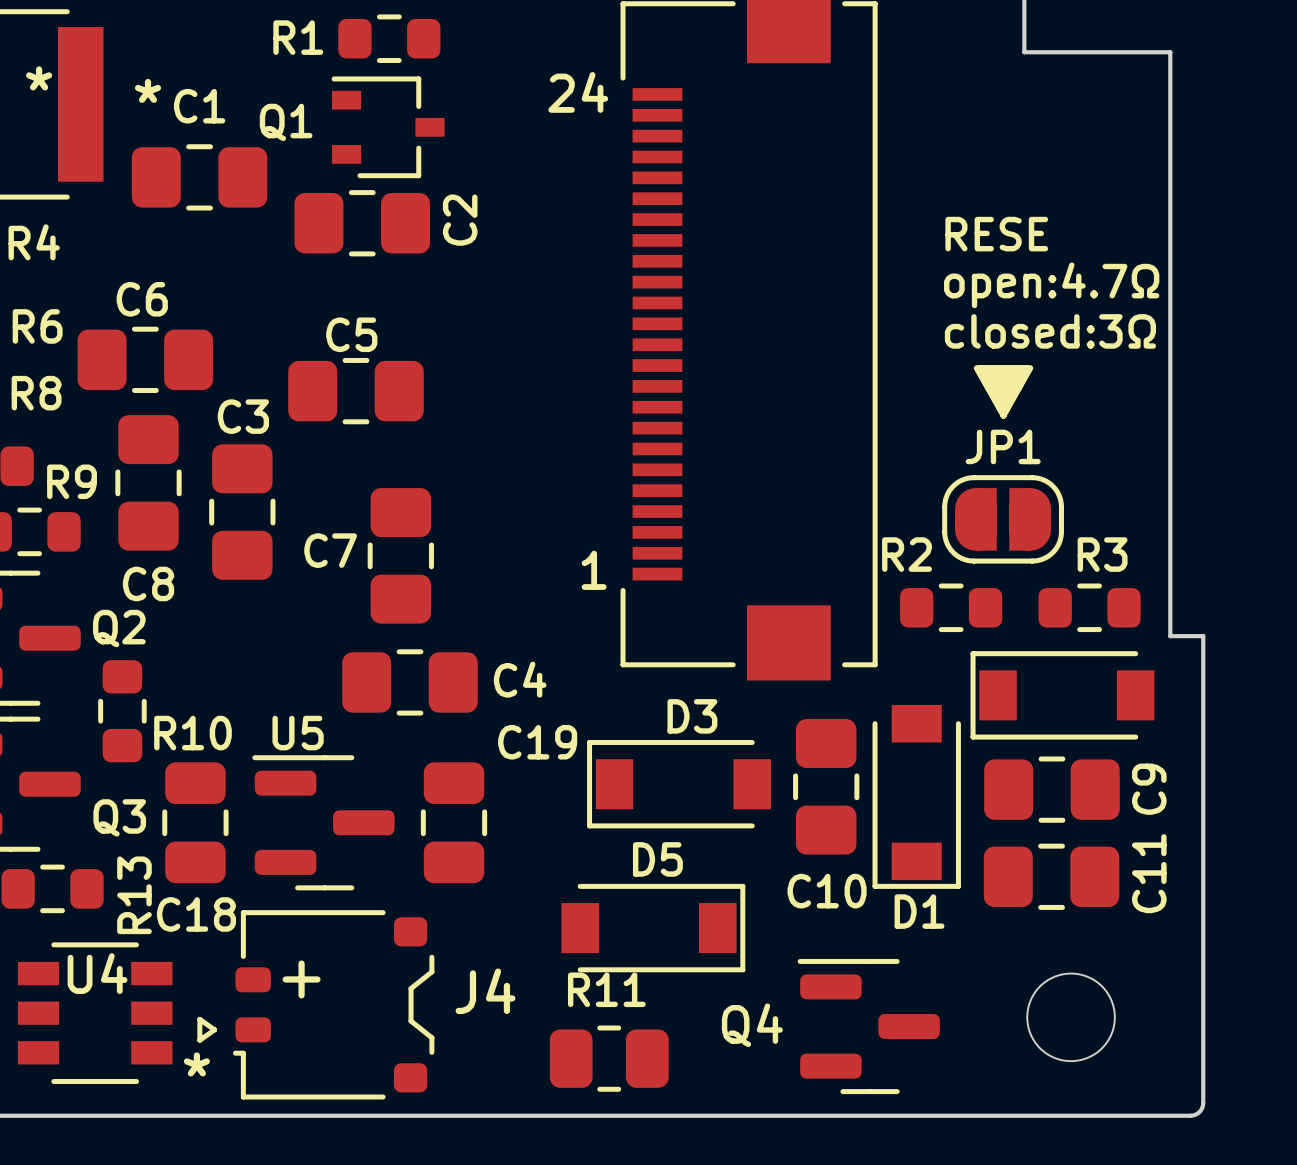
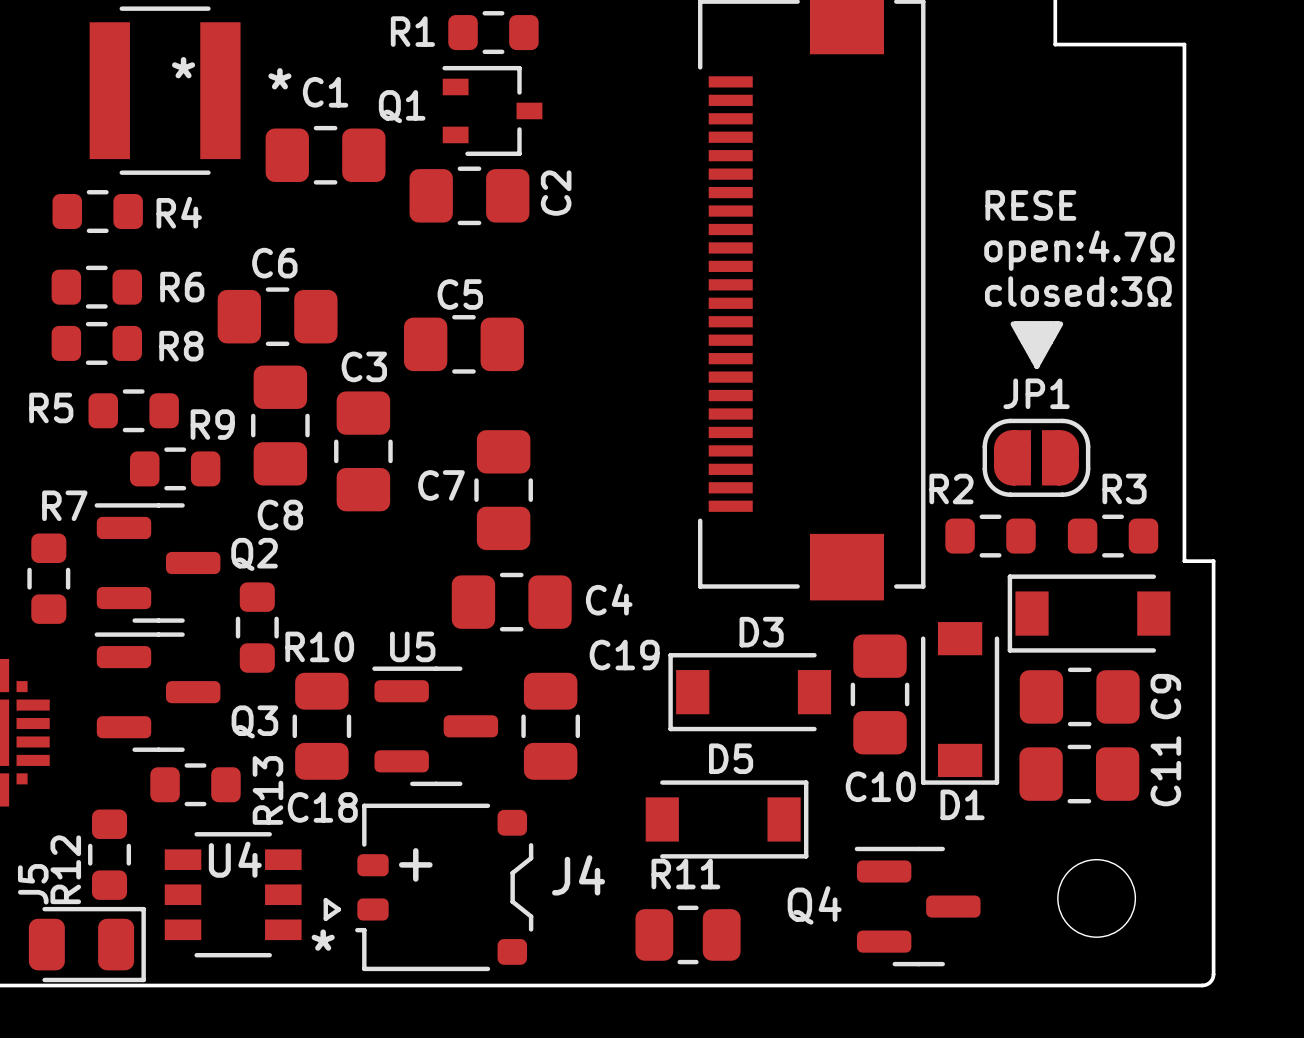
text: 24 (578, 92) -> none
text: 1 (594, 570) -> none

